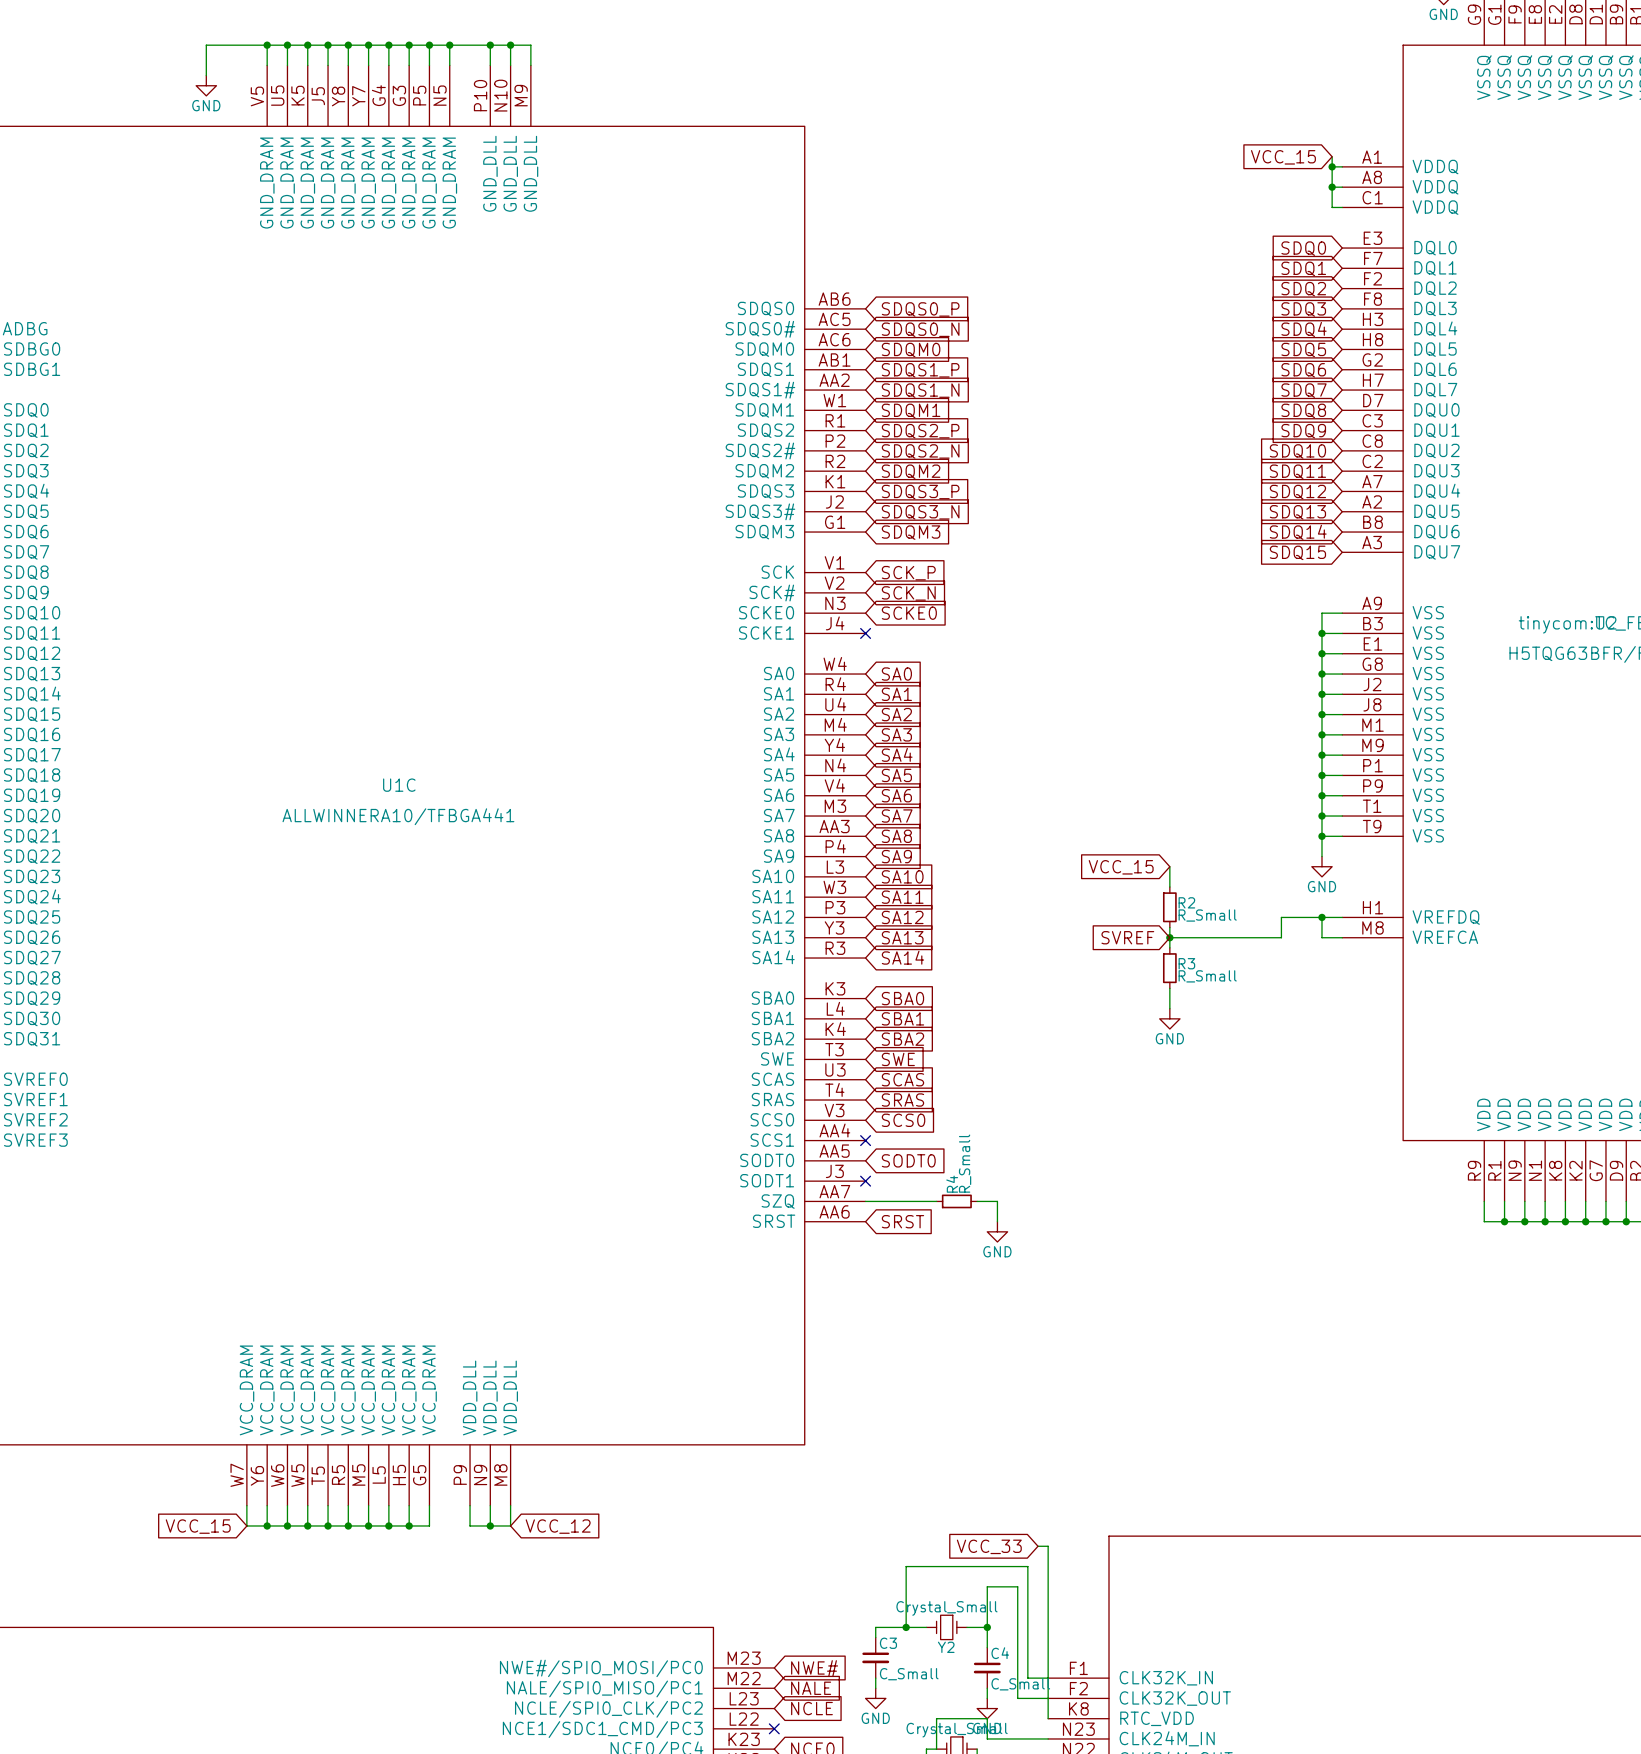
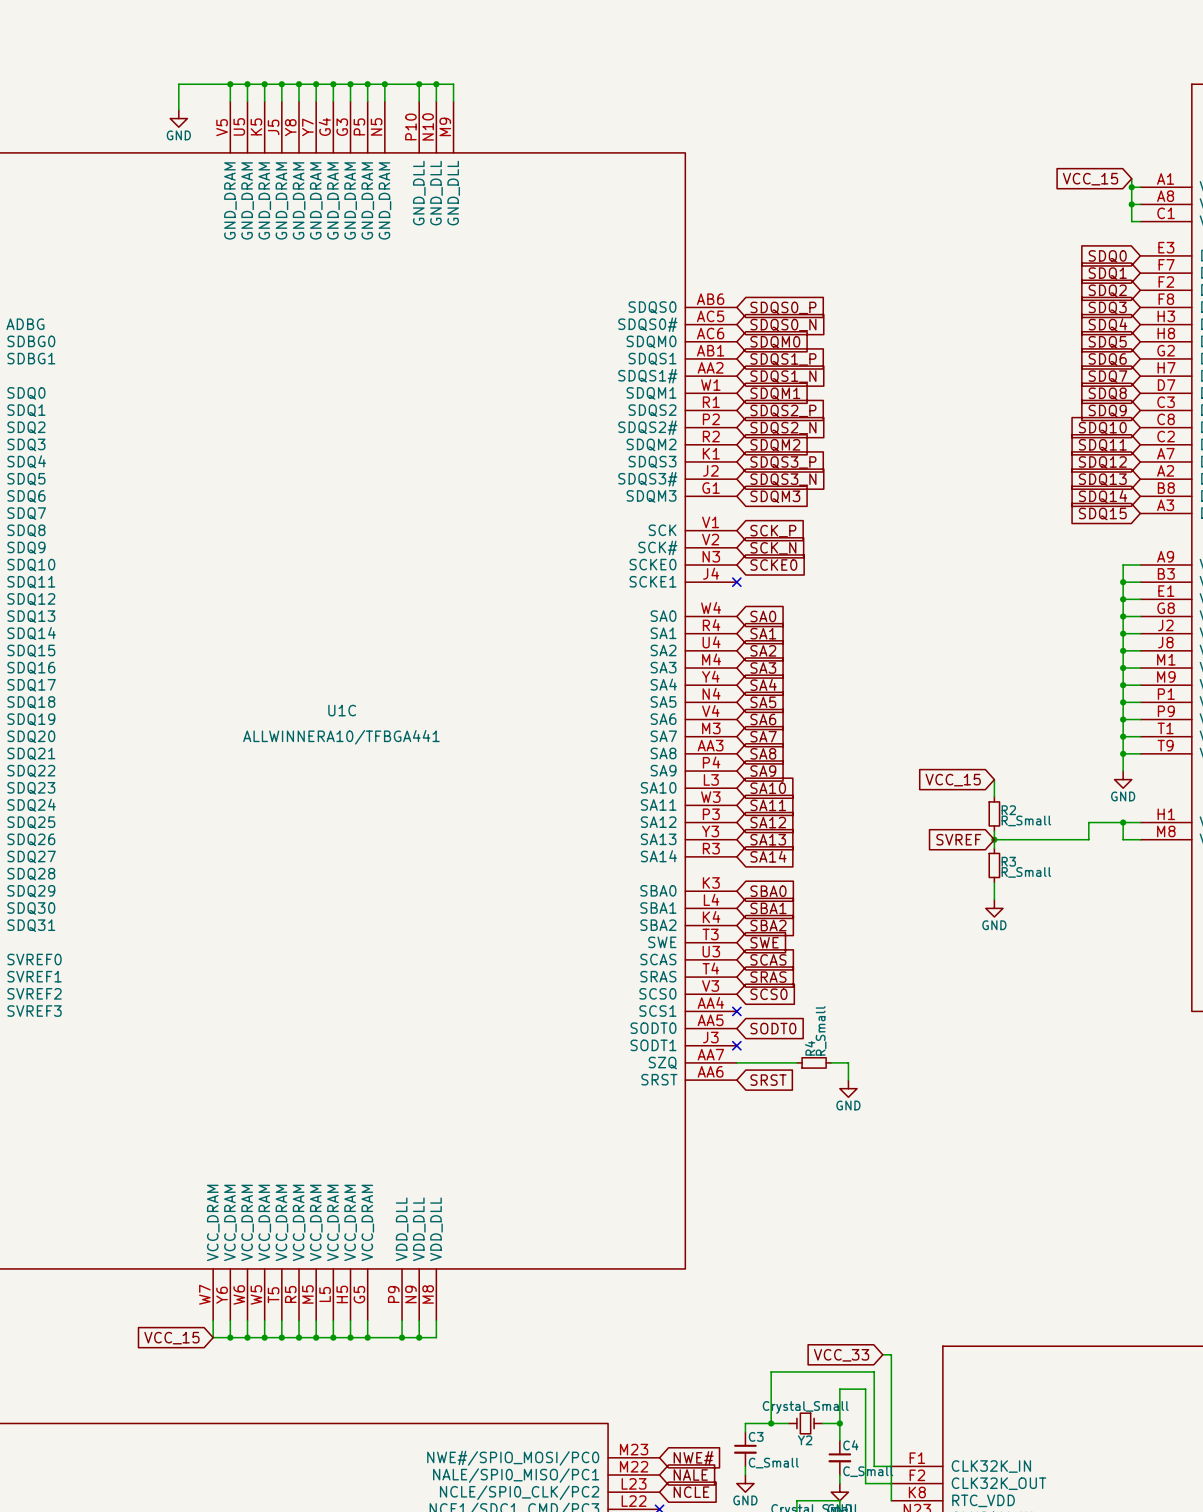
wire: none -> (367, 1337) (402, 1337)
junction: none -> (367, 1337)
junction: none -> (402, 1337)
global label: VCC_12 (558, 1526) -> none

